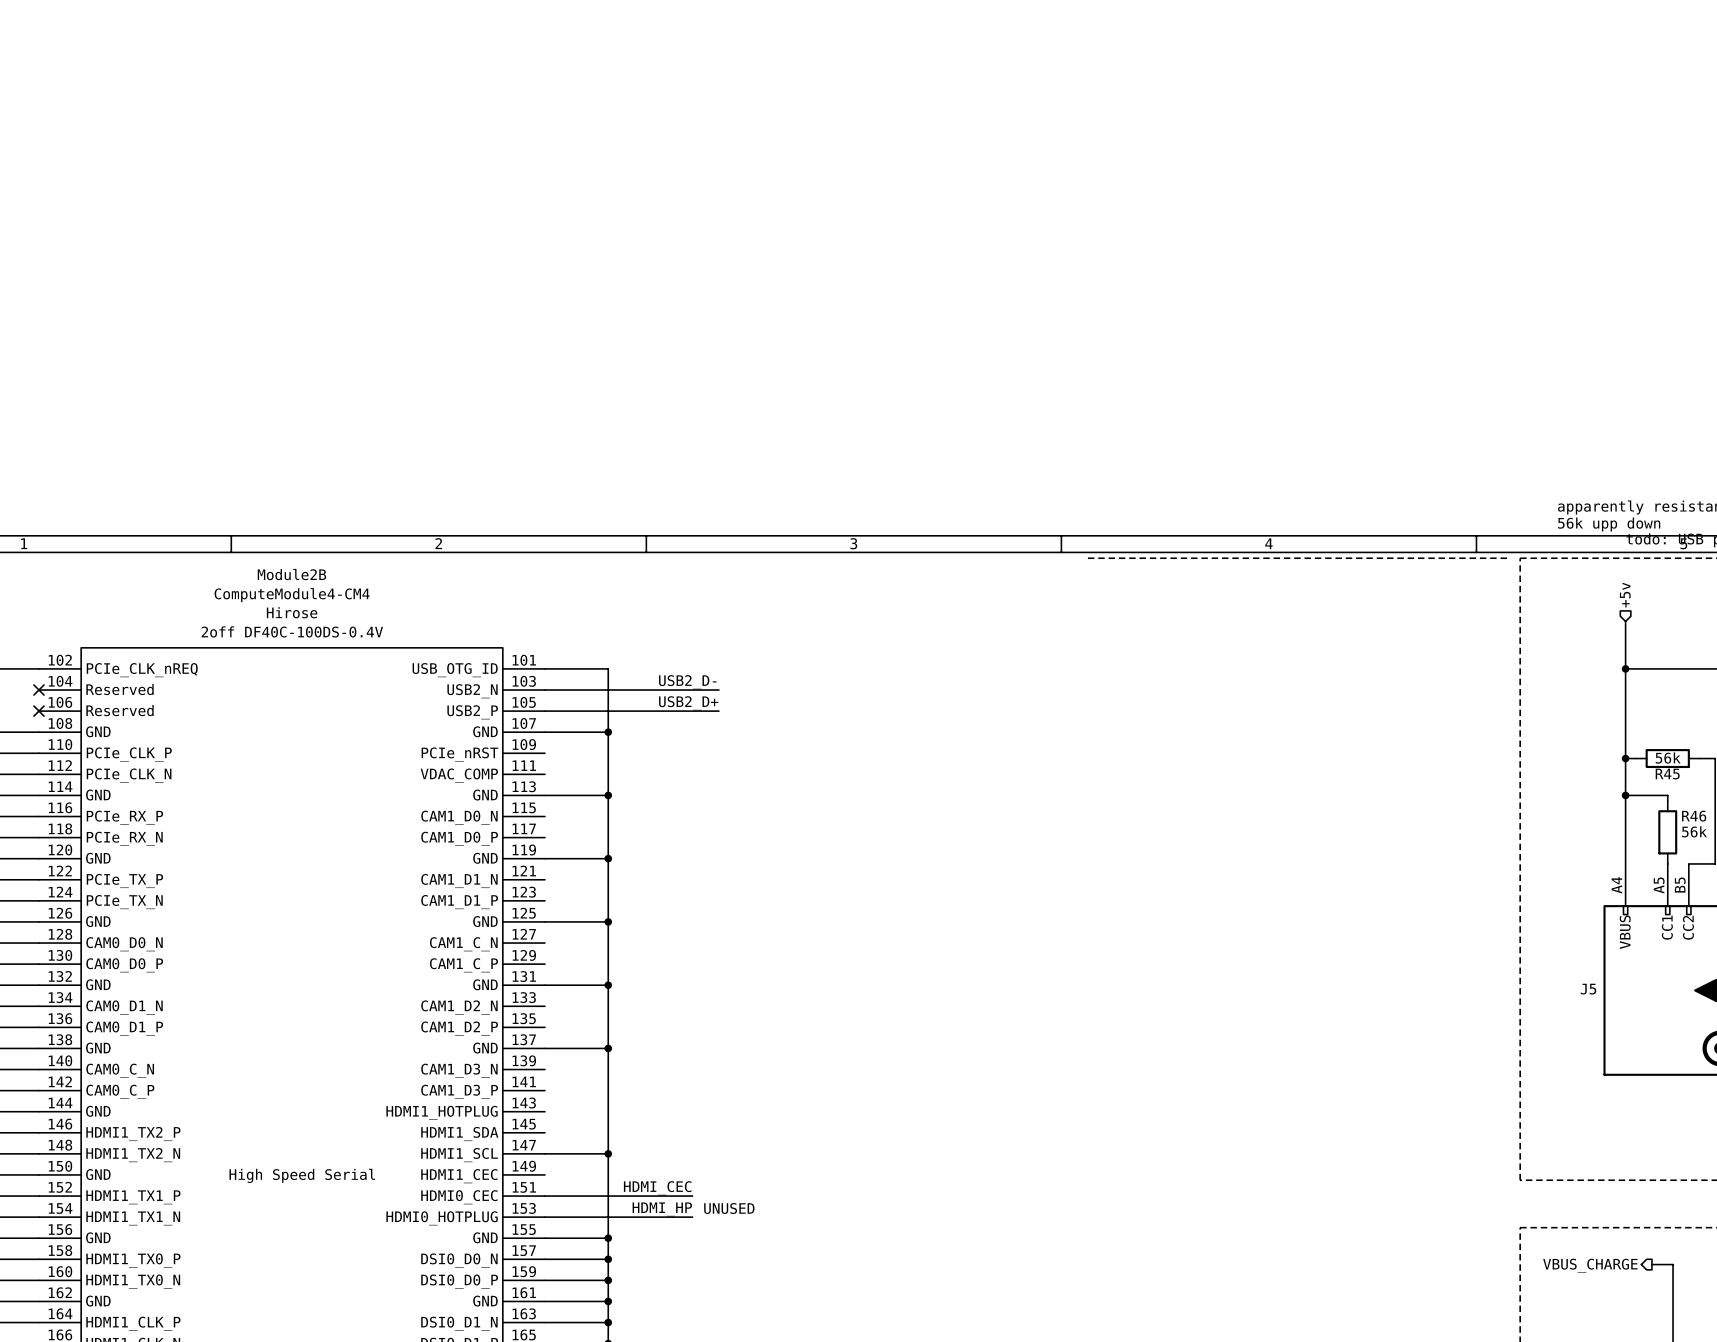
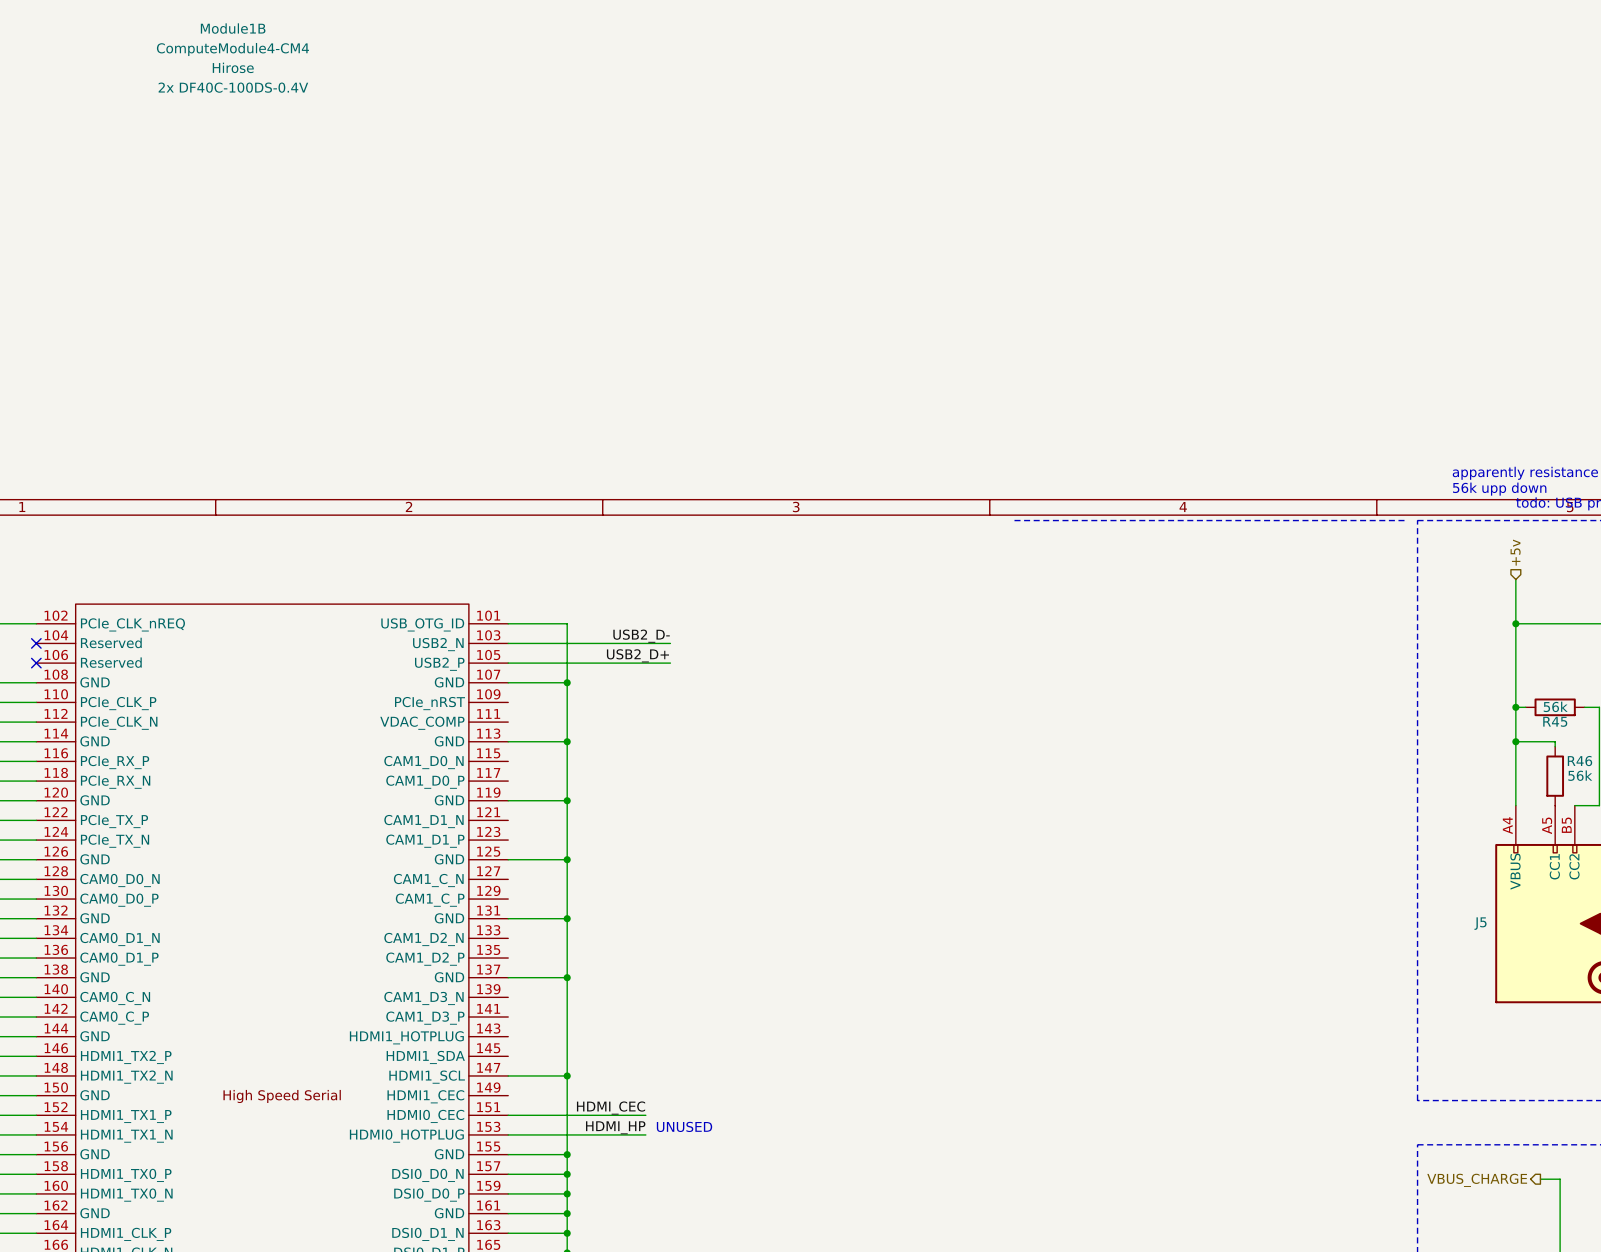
Module2B name: Module2B (291, 574) -> Module1B (233, 28)
Module2B value position: ComputeModule4-CM4 (292, 595) -> ComputeModule4-CM4 (232, 49)
Module2B text position: Hirose (292, 612) -> Hirose (233, 67)
Module2B text: 2off DF40C-100DS-0.4V (292, 631) -> 2x DF40C-100DS-0.4V (233, 87)

